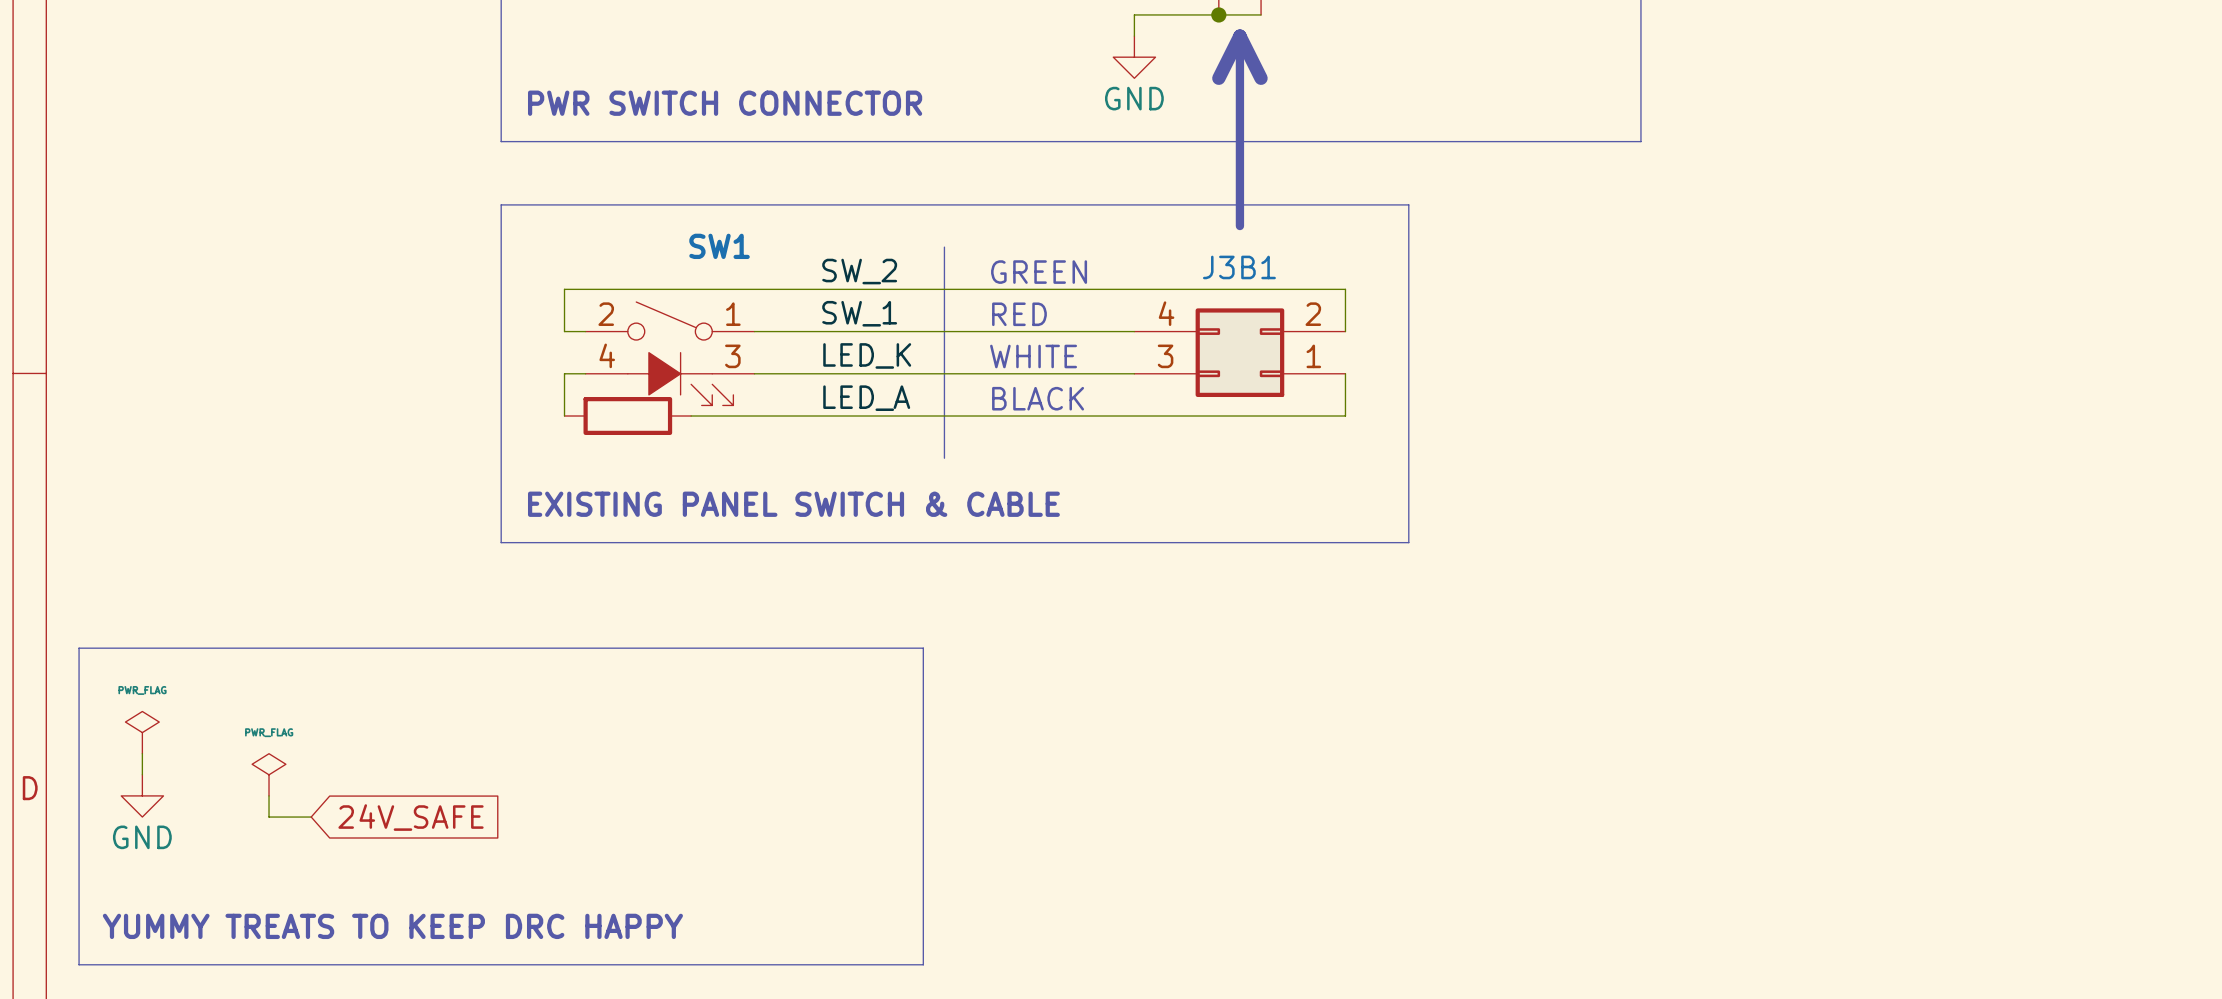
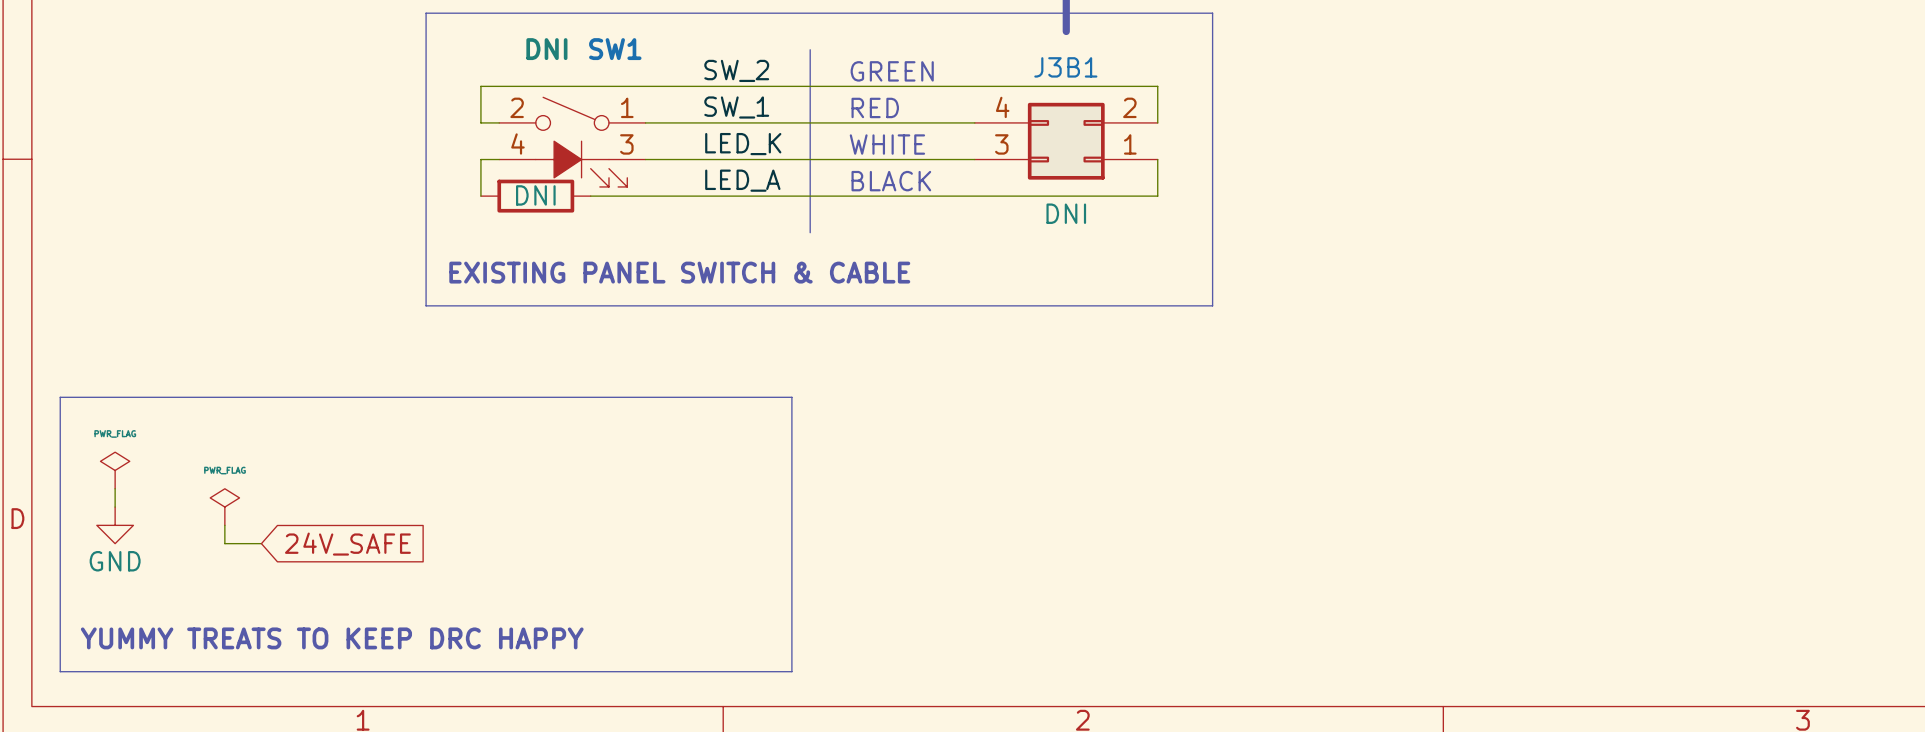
SW1 value: none -> DNI (546, 49)
part value: none -> DNI (535, 195)
J3B1 value: none -> DNI (1066, 213)

